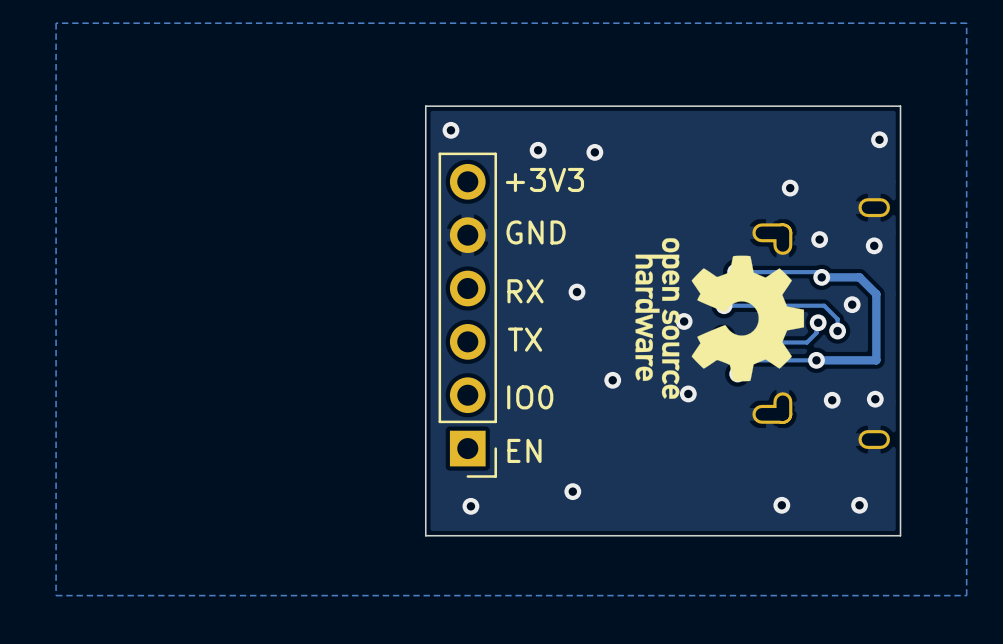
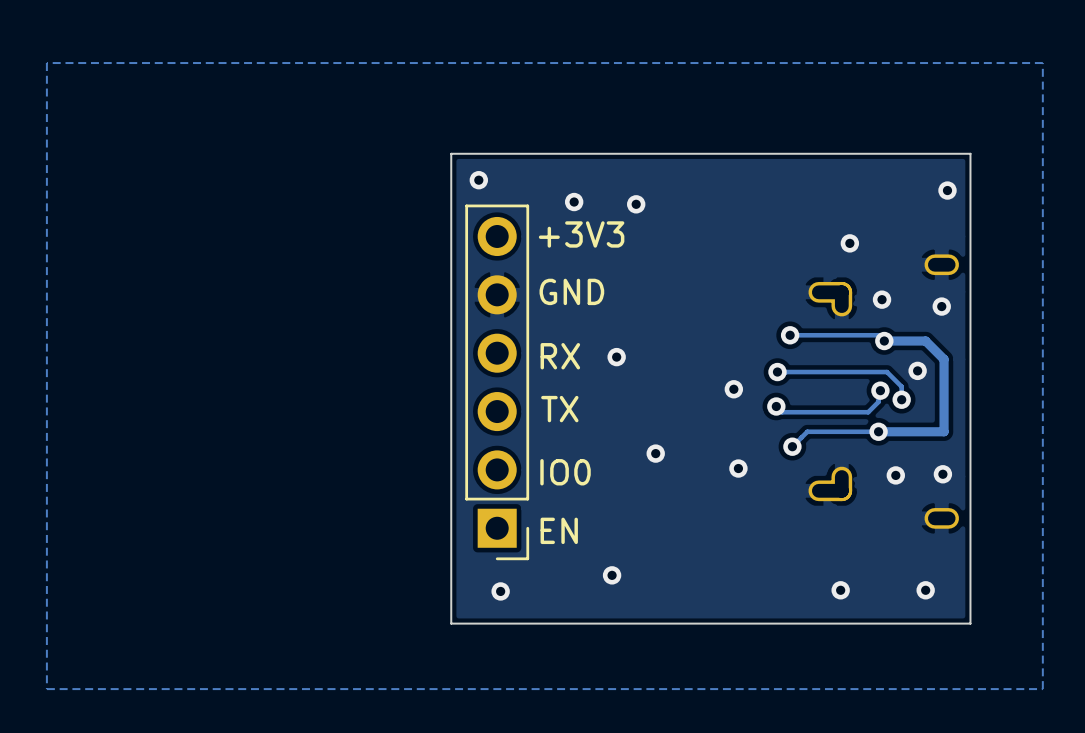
drawing: [635, 238, 805, 399] -> none

